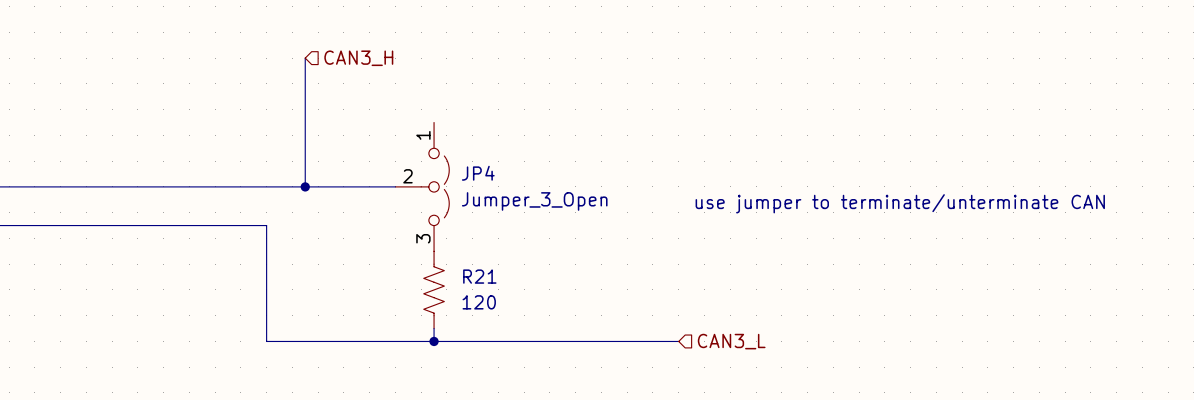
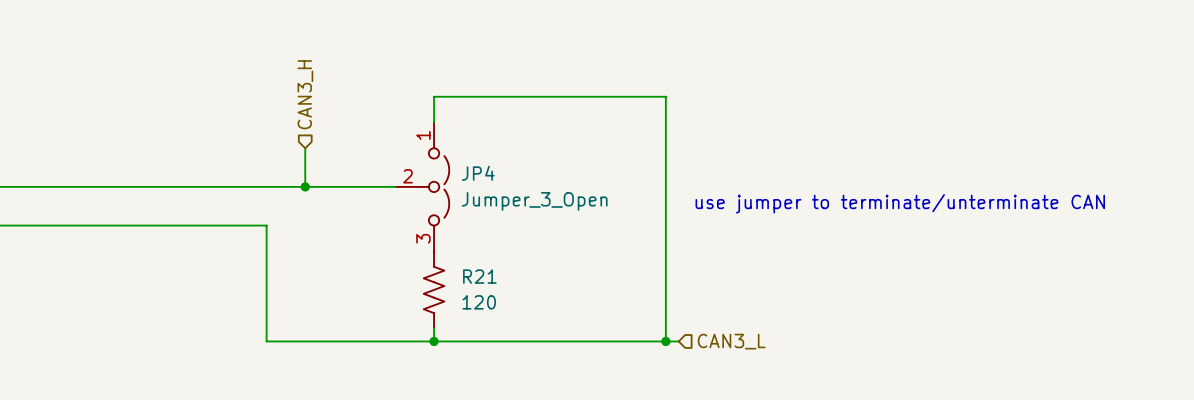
wire: (305, 58) (305, 148) -> none
hierarchical label rotation: 0° (358, 58) -> 90° counterclockwise (305, 94)
wire: none -> (434, 122) (434, 96) (665, 96) (665, 341)
junction: none -> (665, 341)

